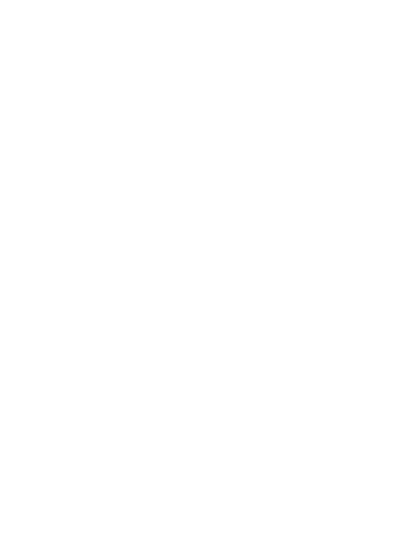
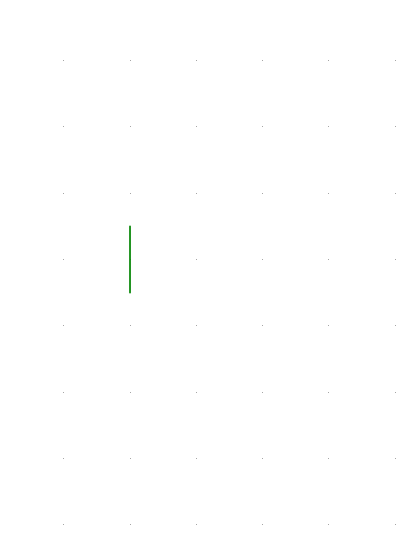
wire: none -> (130, 226) (130, 292)

